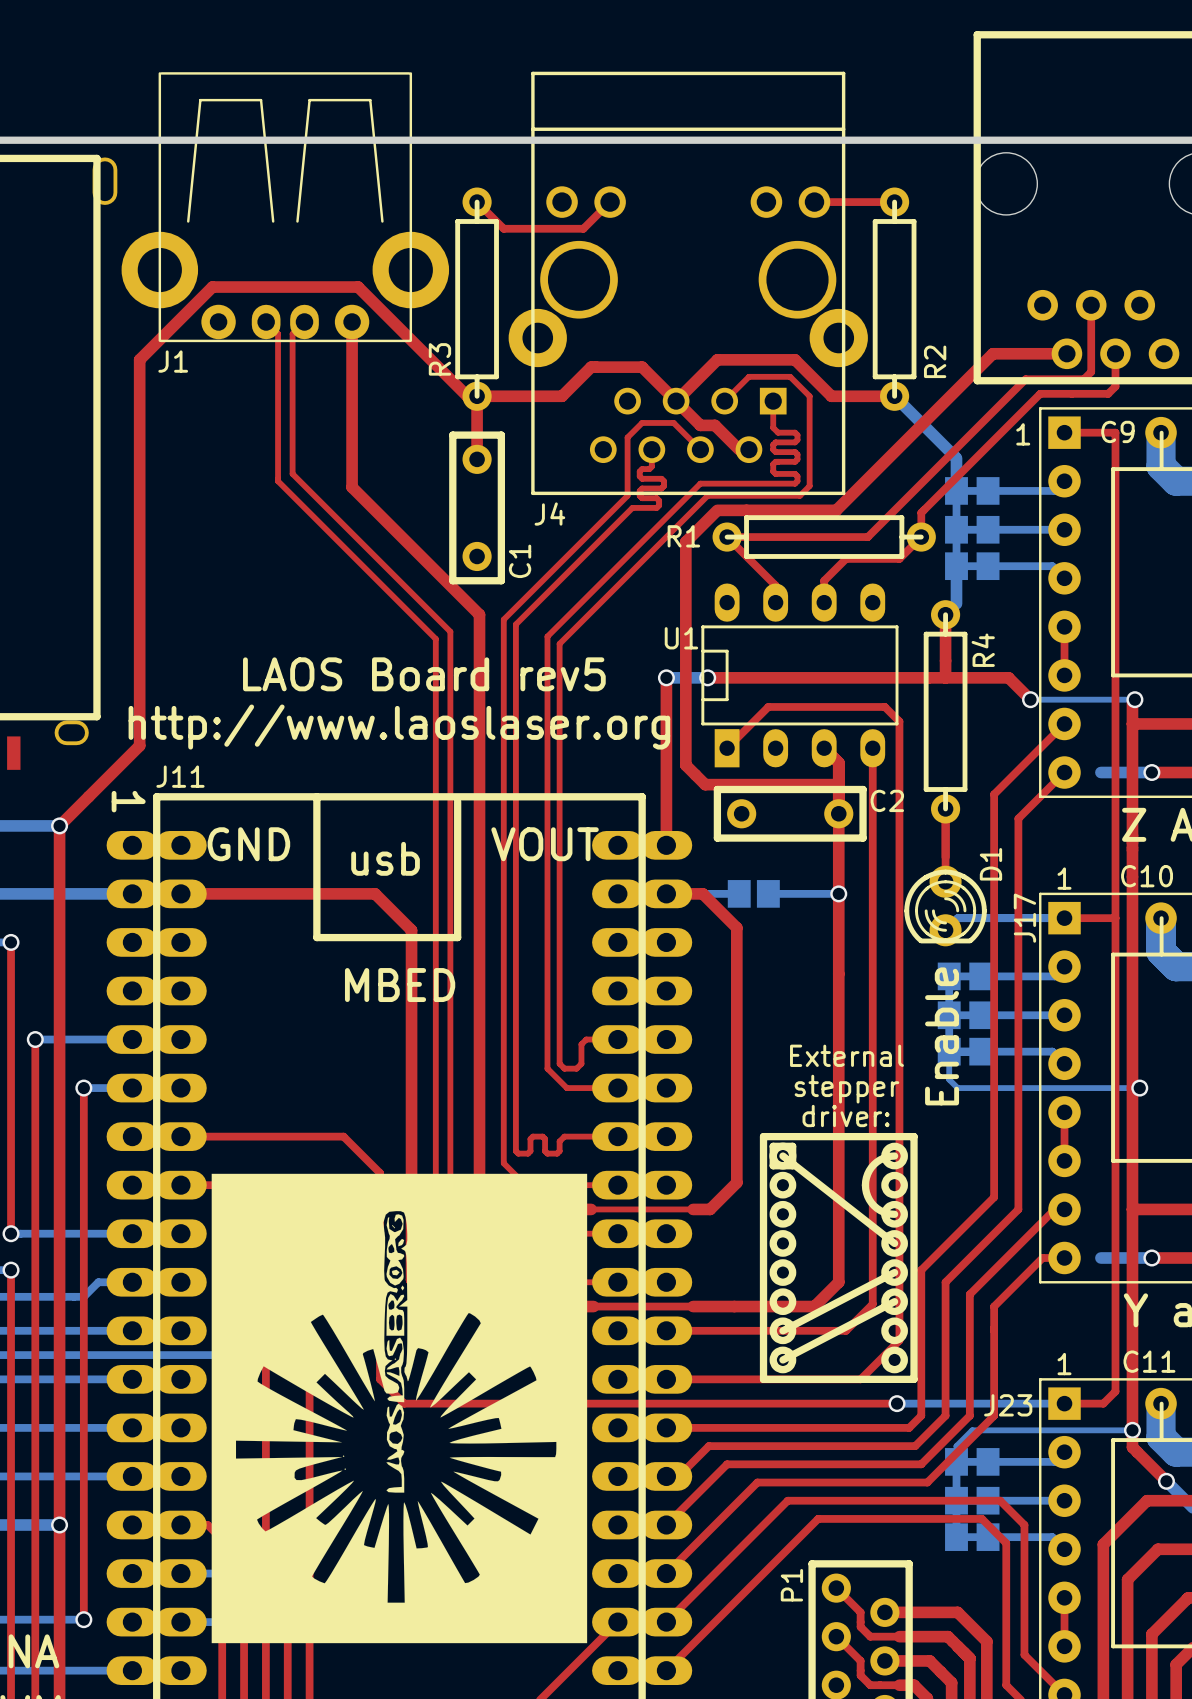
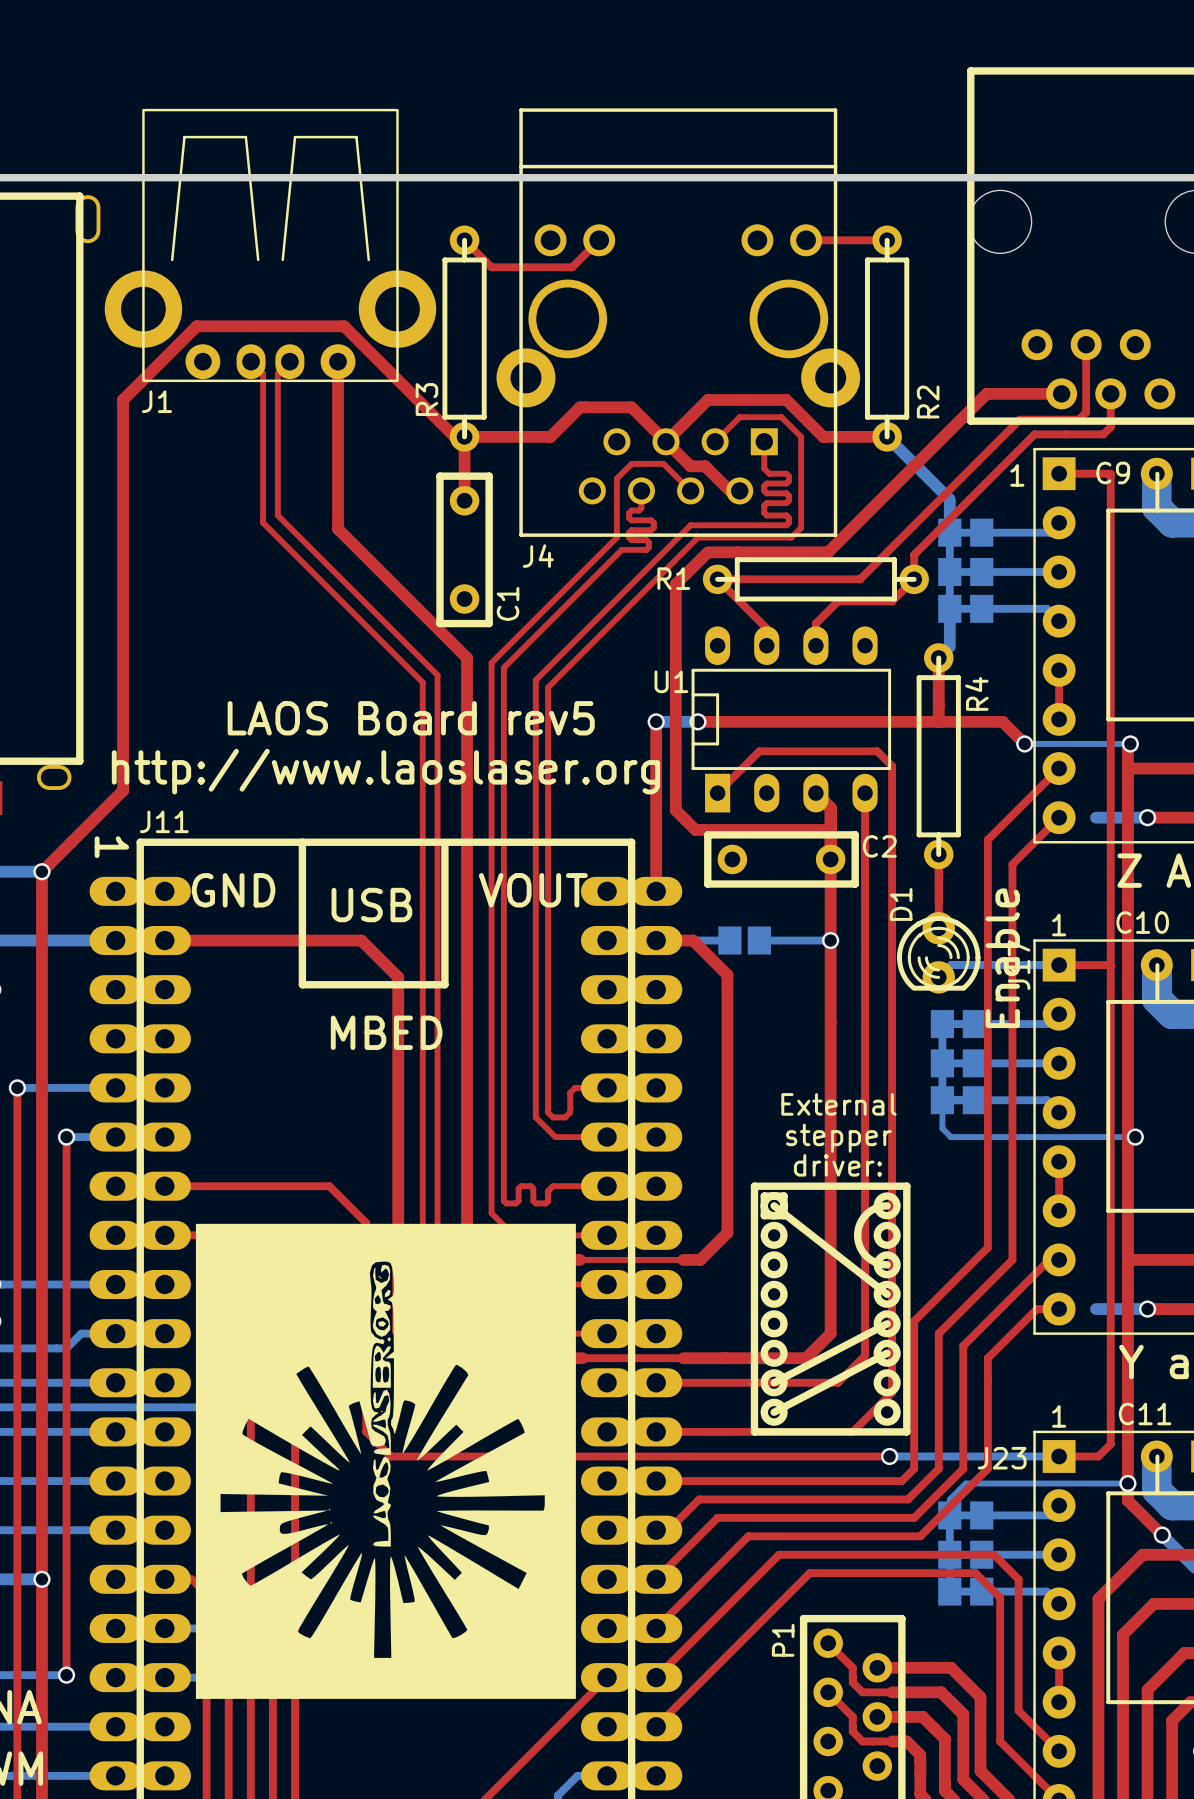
text: usb (385, 858) -> USB (371, 905)
D1 name position: D1 (990, 864) -> D1 (901, 904)
text position: Enable (942, 1036) -> Enable (1002, 958)

